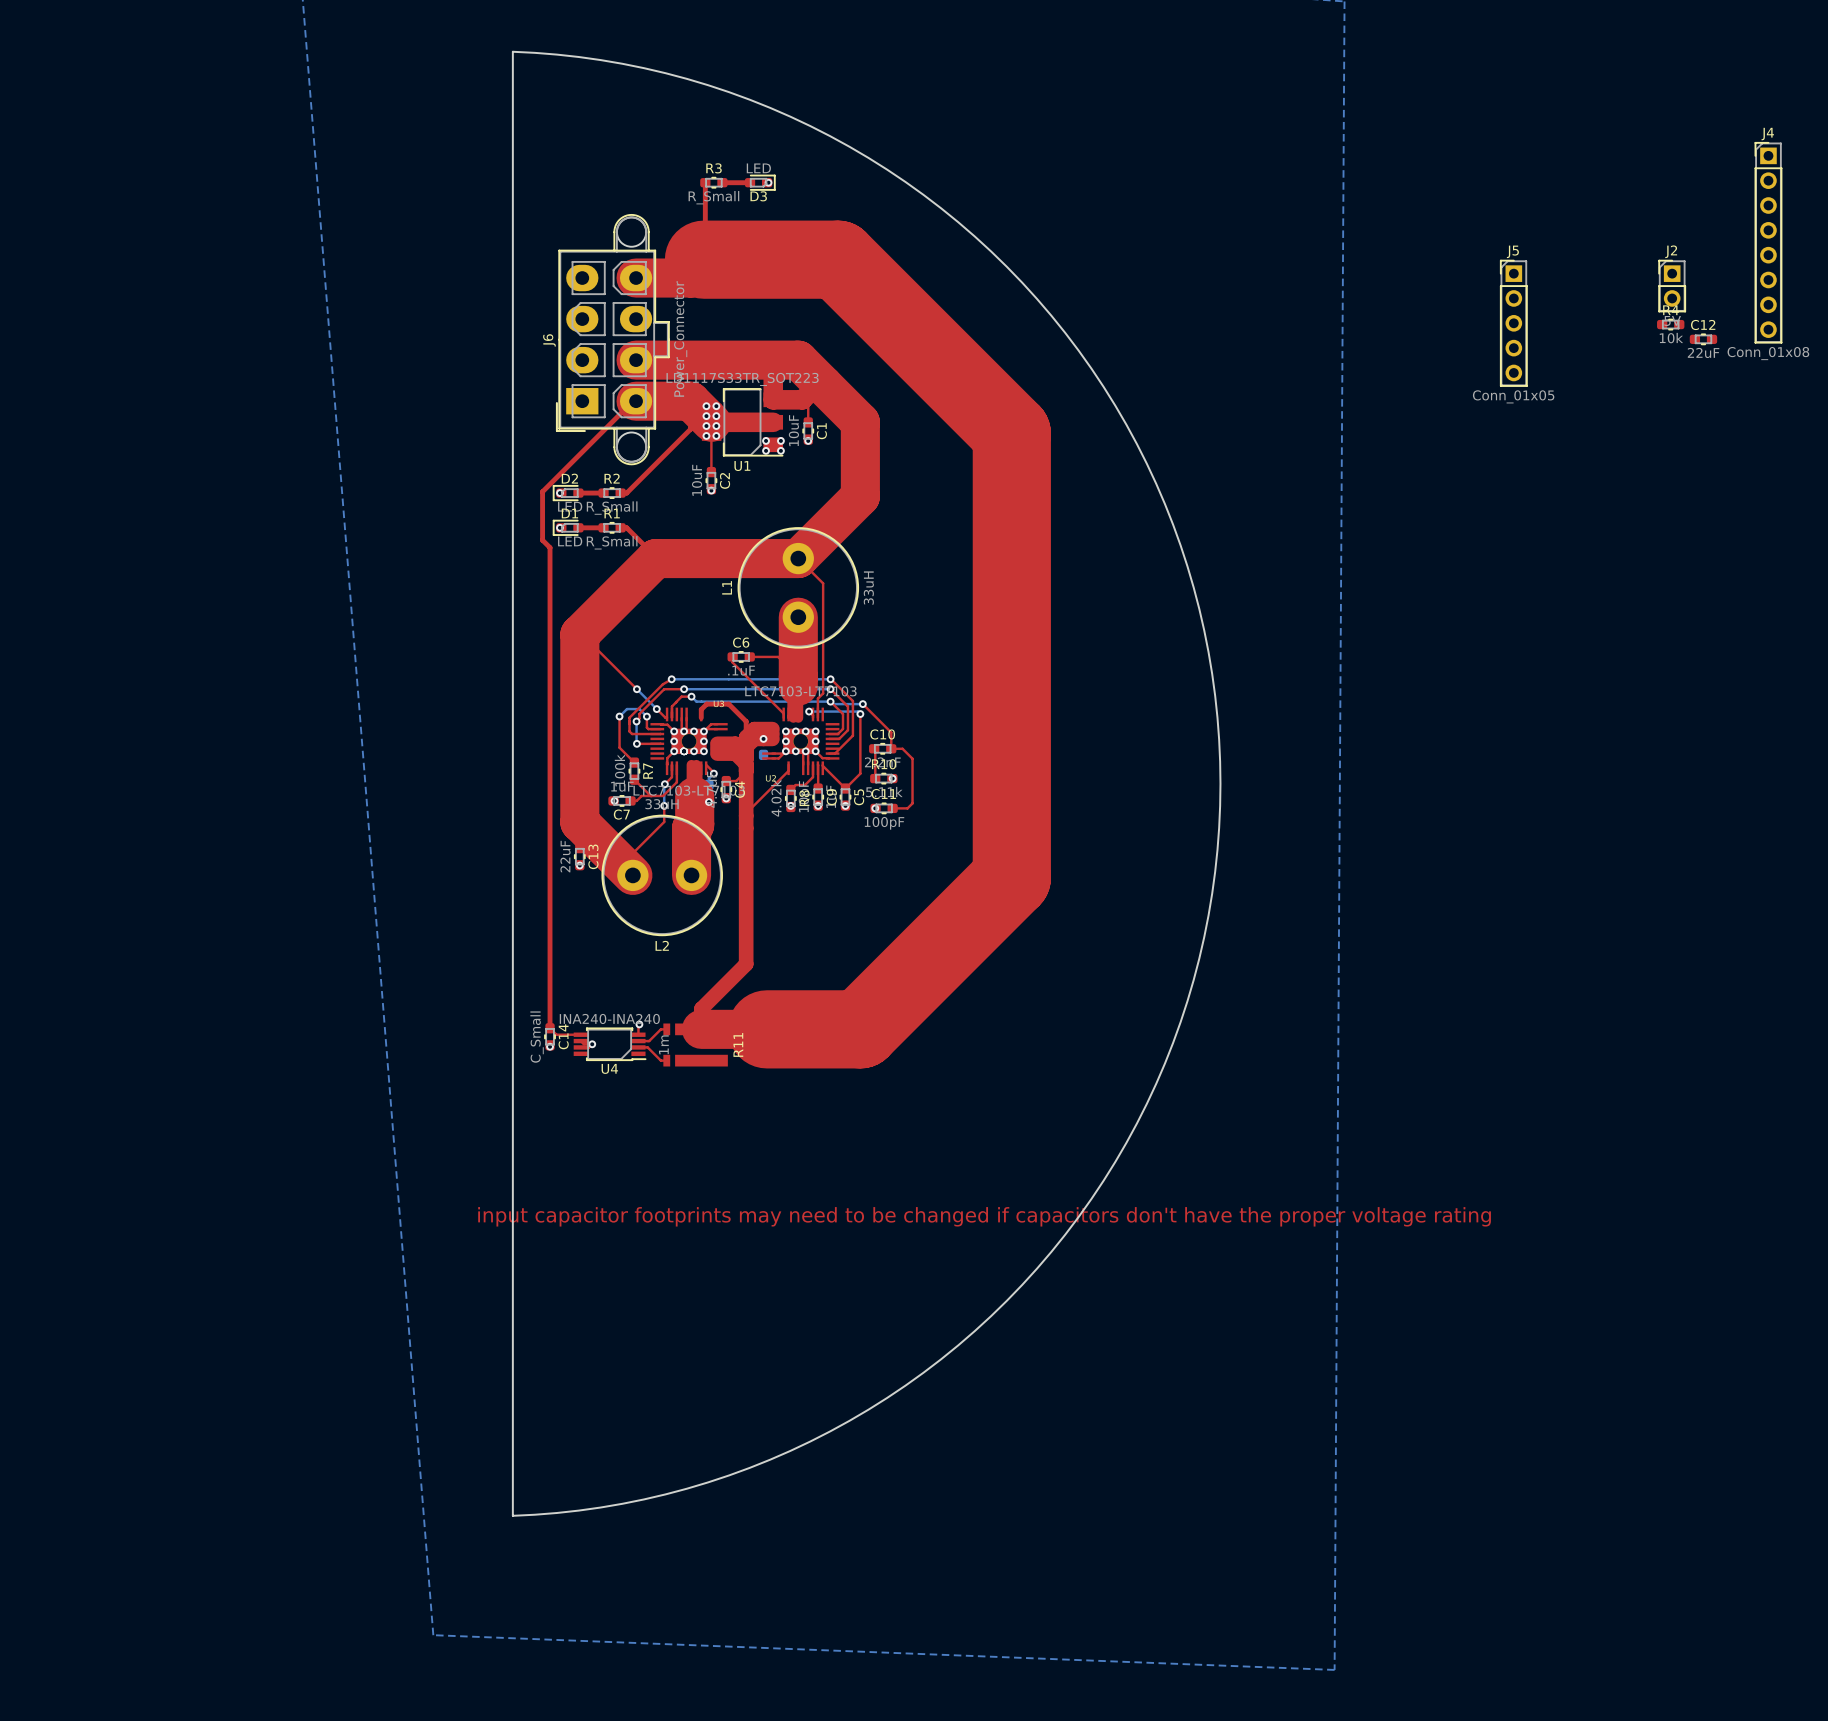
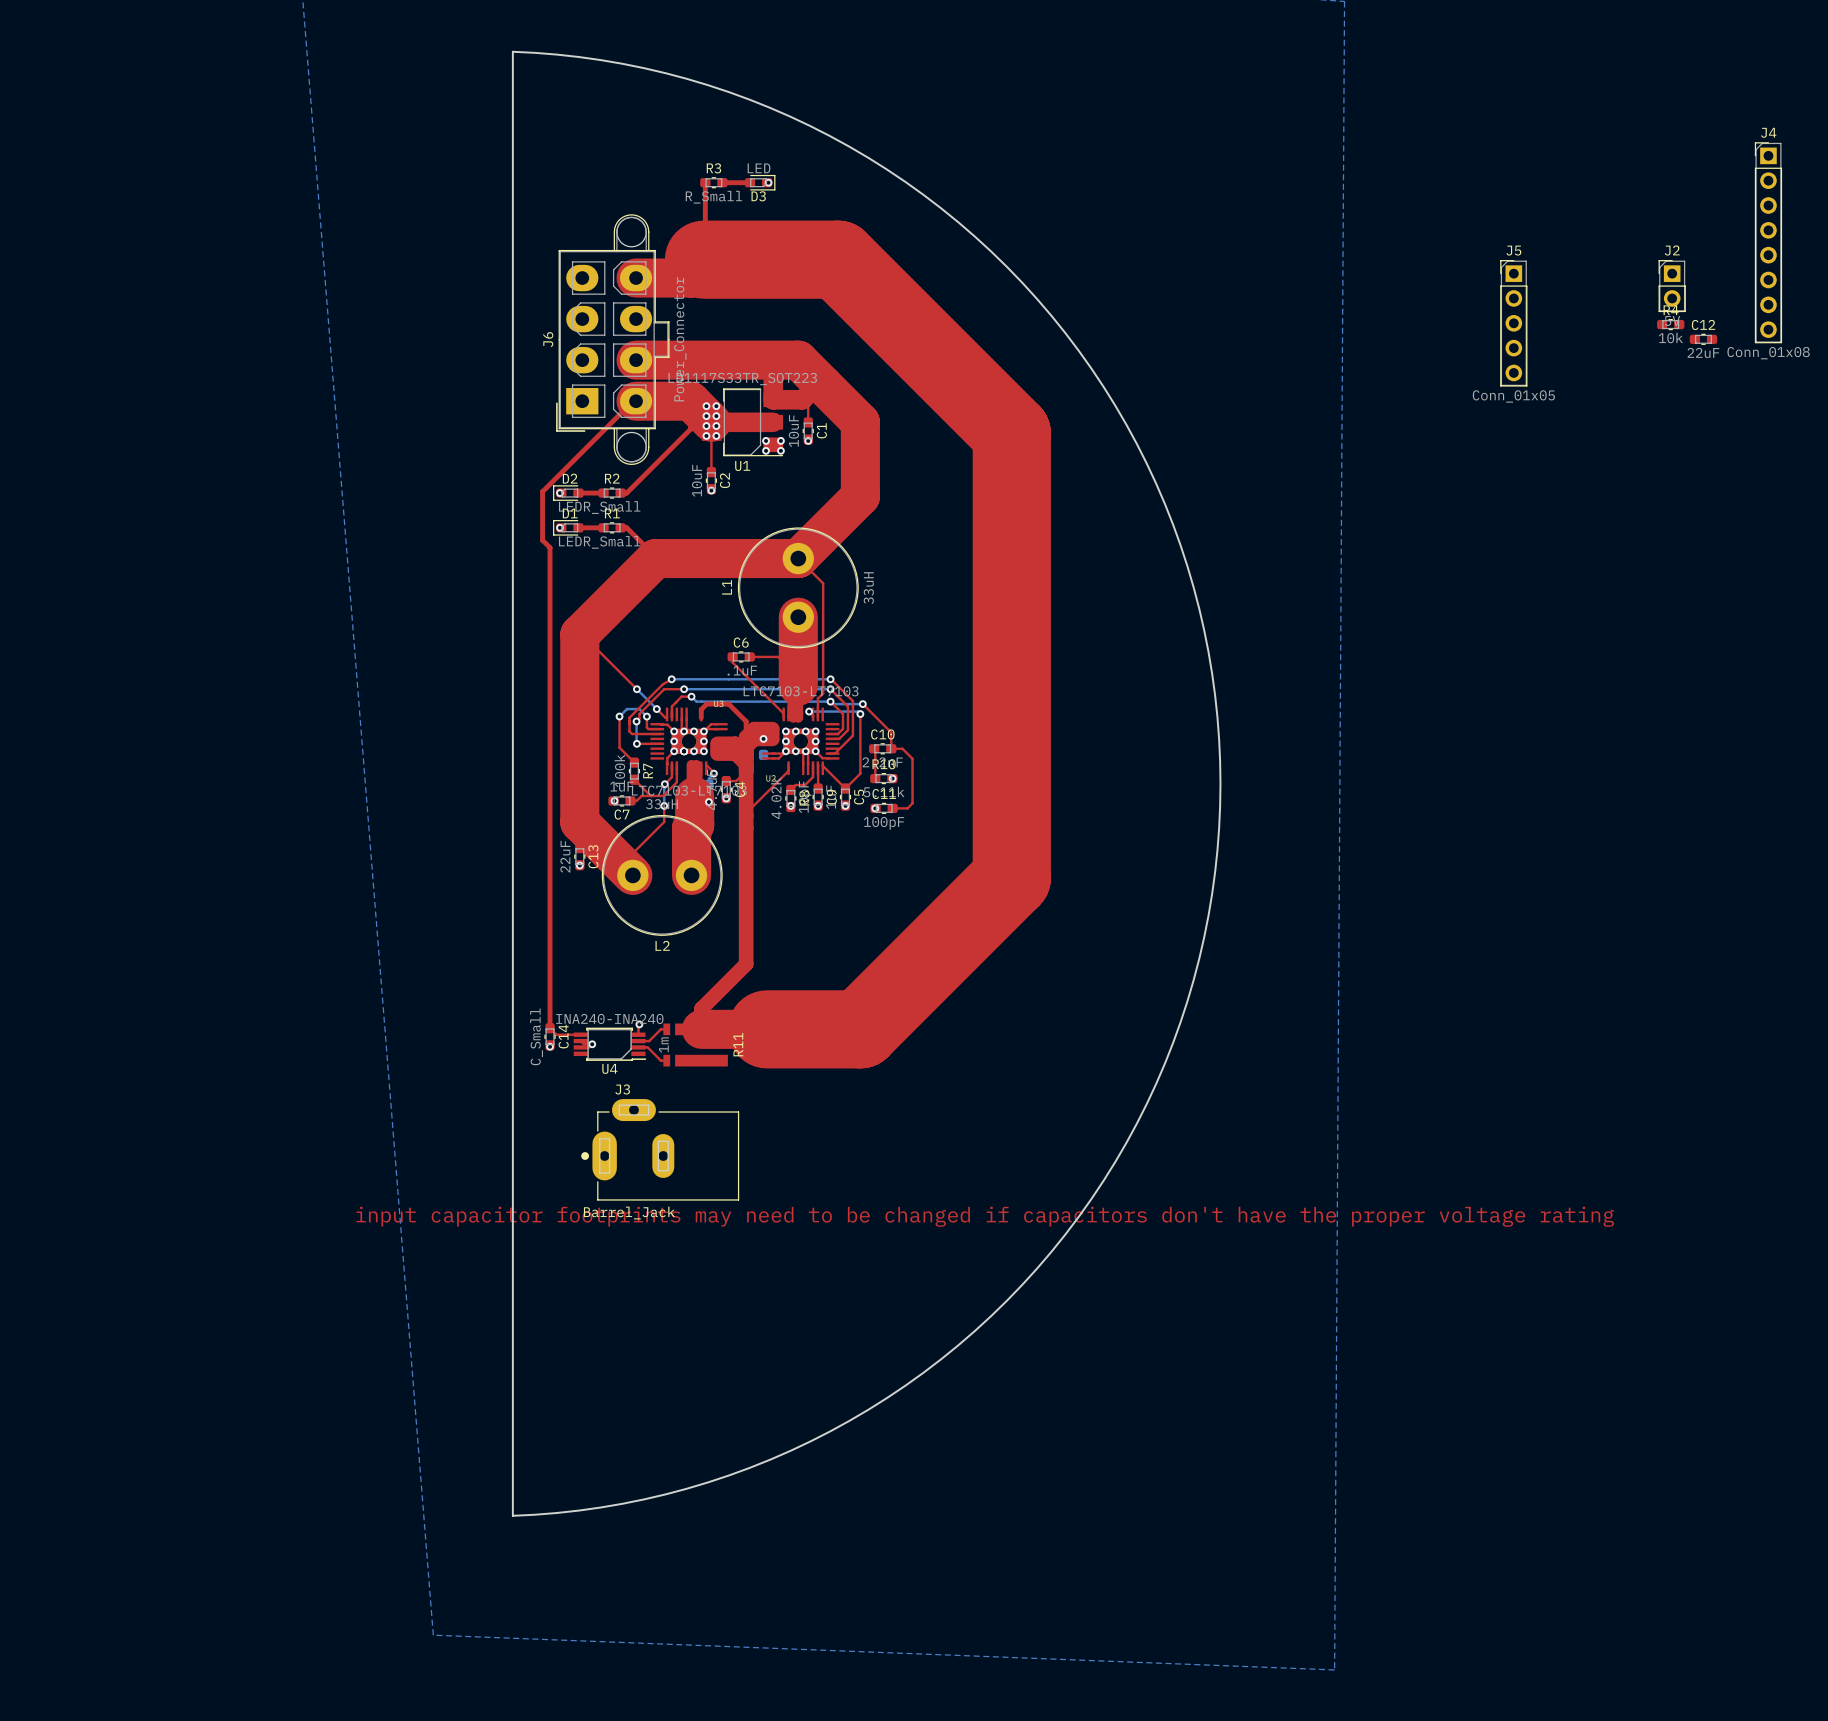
J3: none -> Barrel_Jack (660, 1149)

